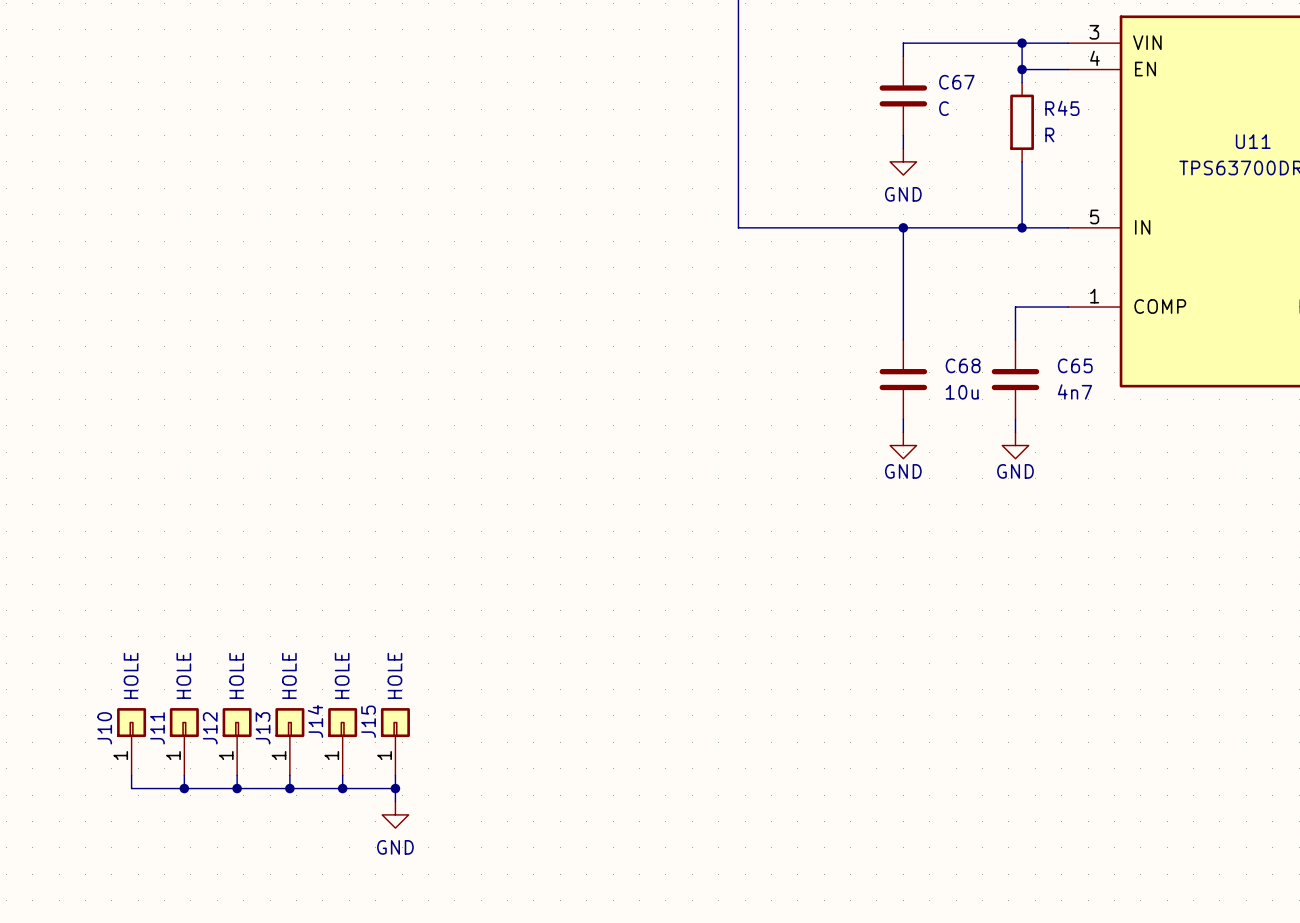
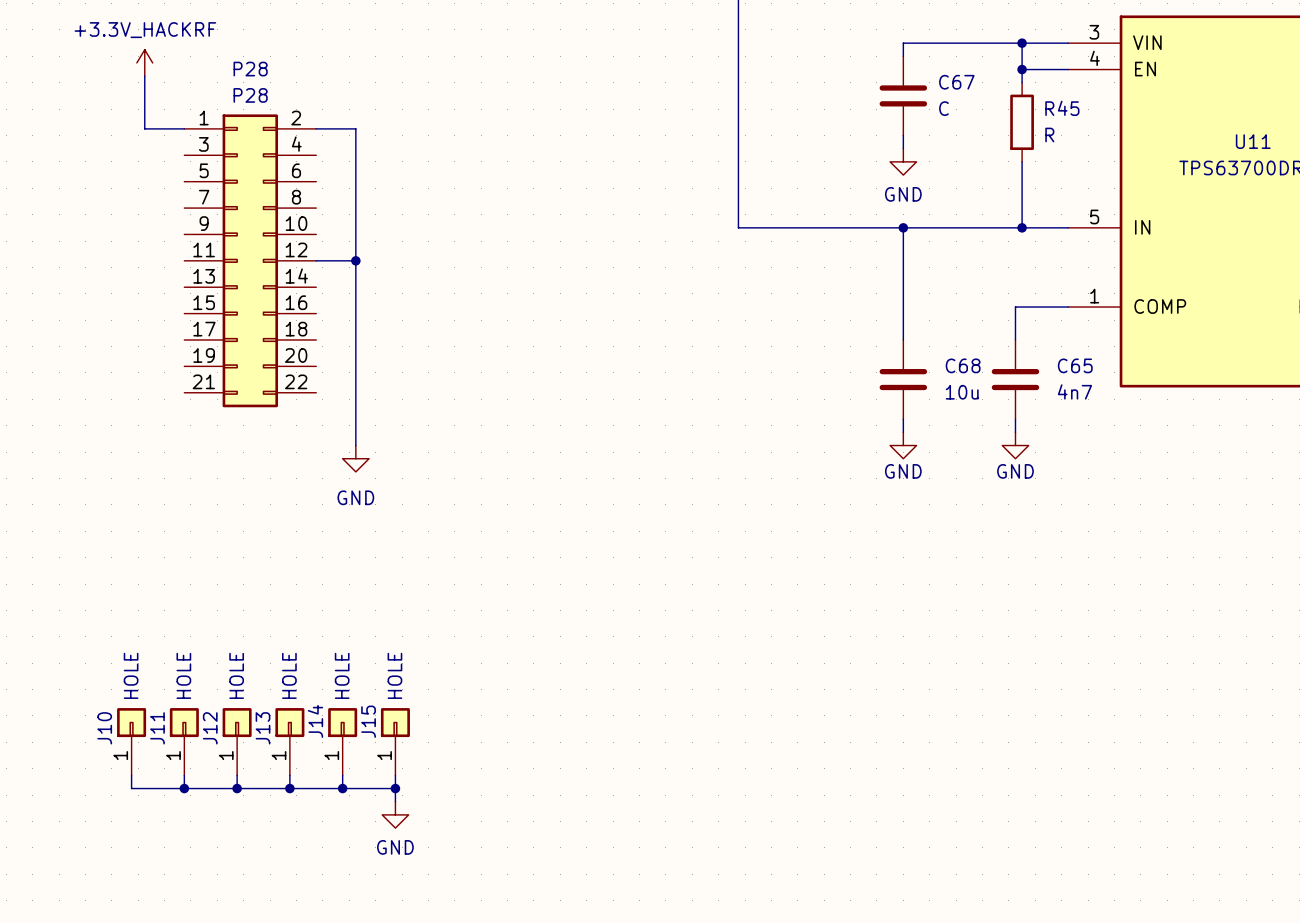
power symbol: none -> +3.3V_HACKRF (144, 62)
wire: none -> (144, 76) (144, 128) (184, 128)
wire: none -> (316, 128) (355, 128) (355, 260)
P28: none -> P28 (250, 260)
wire: none -> (316, 260) (355, 260)
wire: none -> (355, 260) (355, 445)
junction: none -> (355, 260)
power symbol: none -> GND (355, 458)

